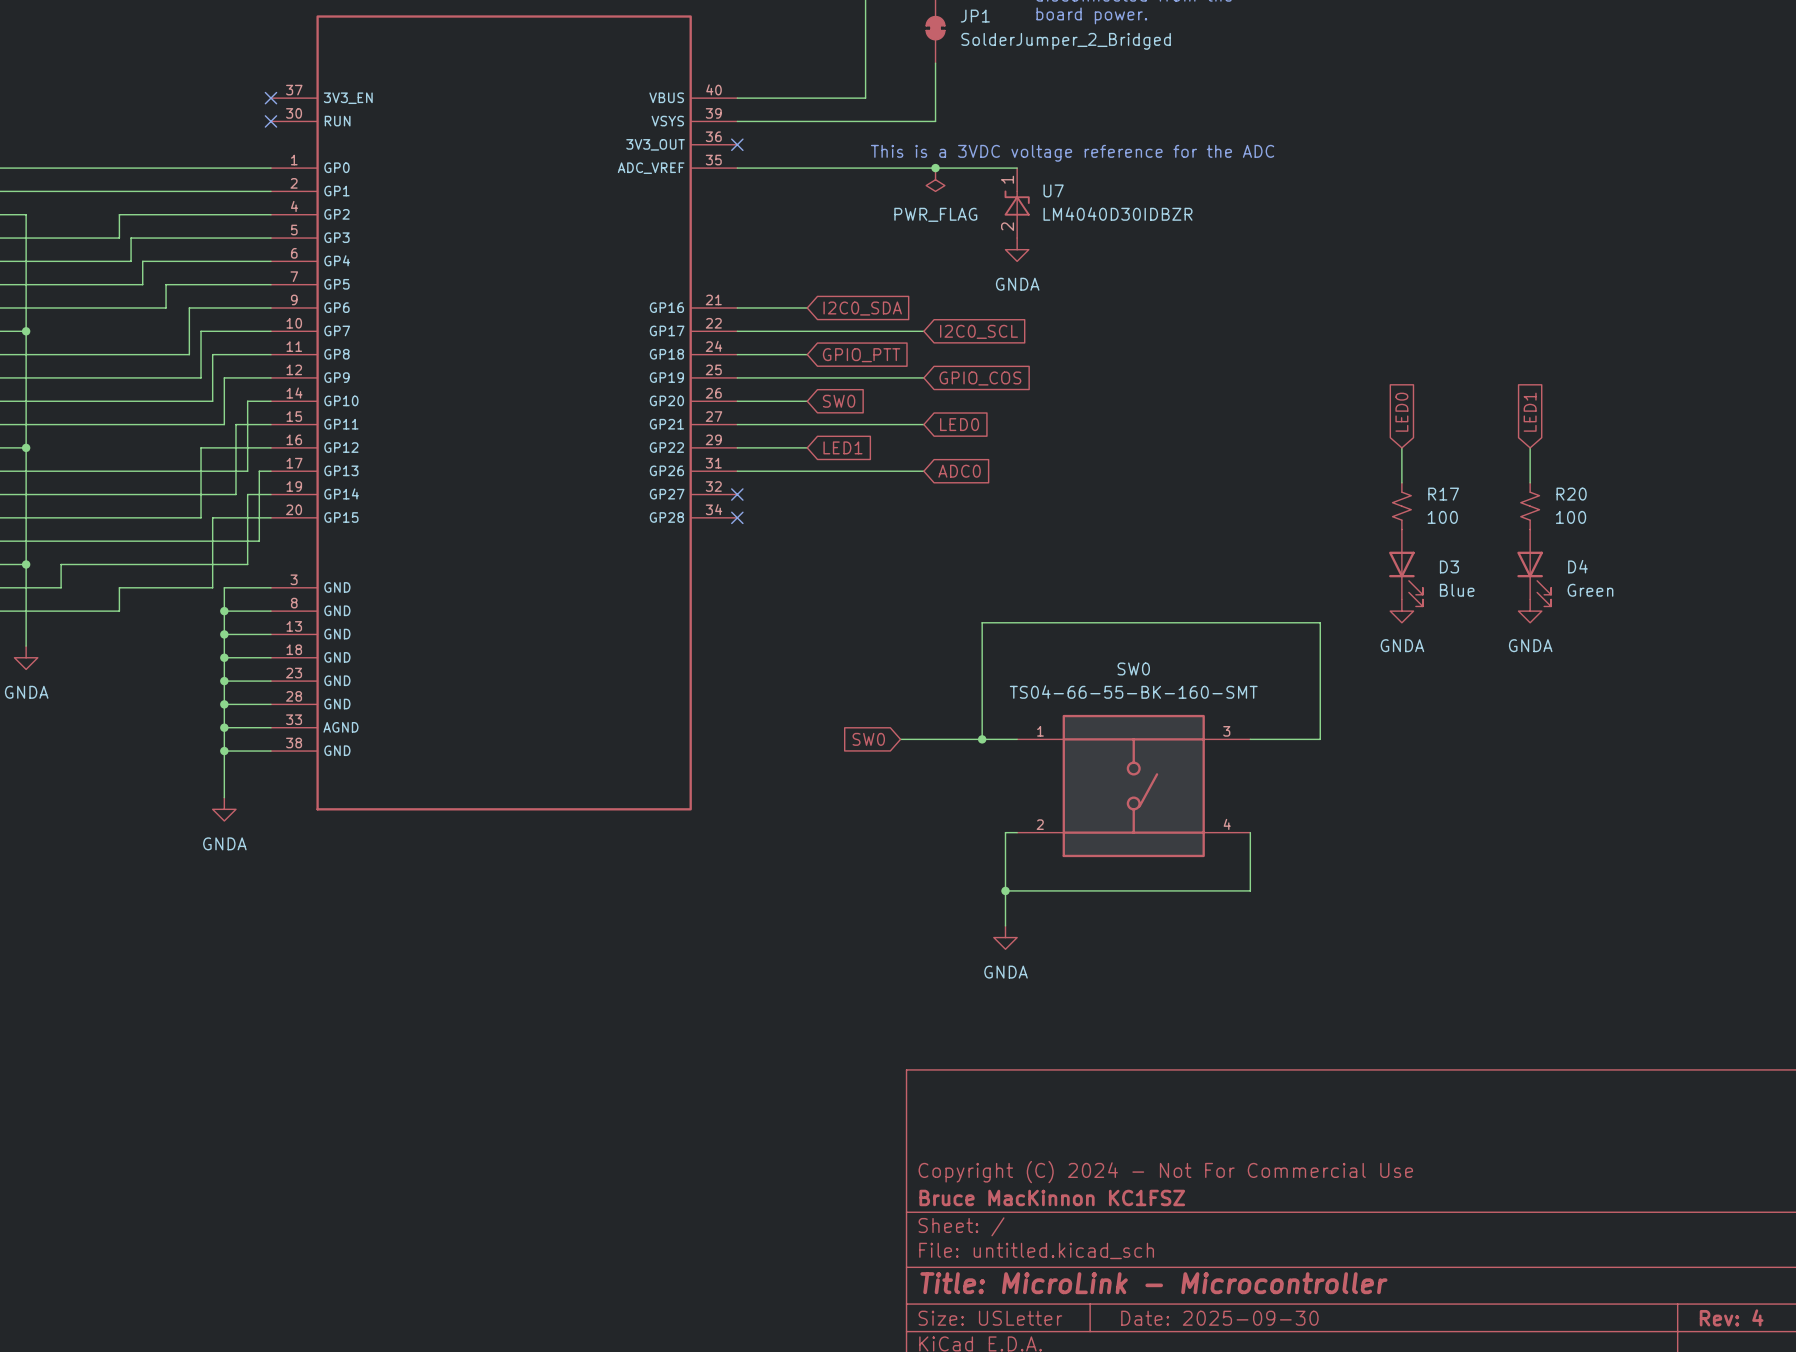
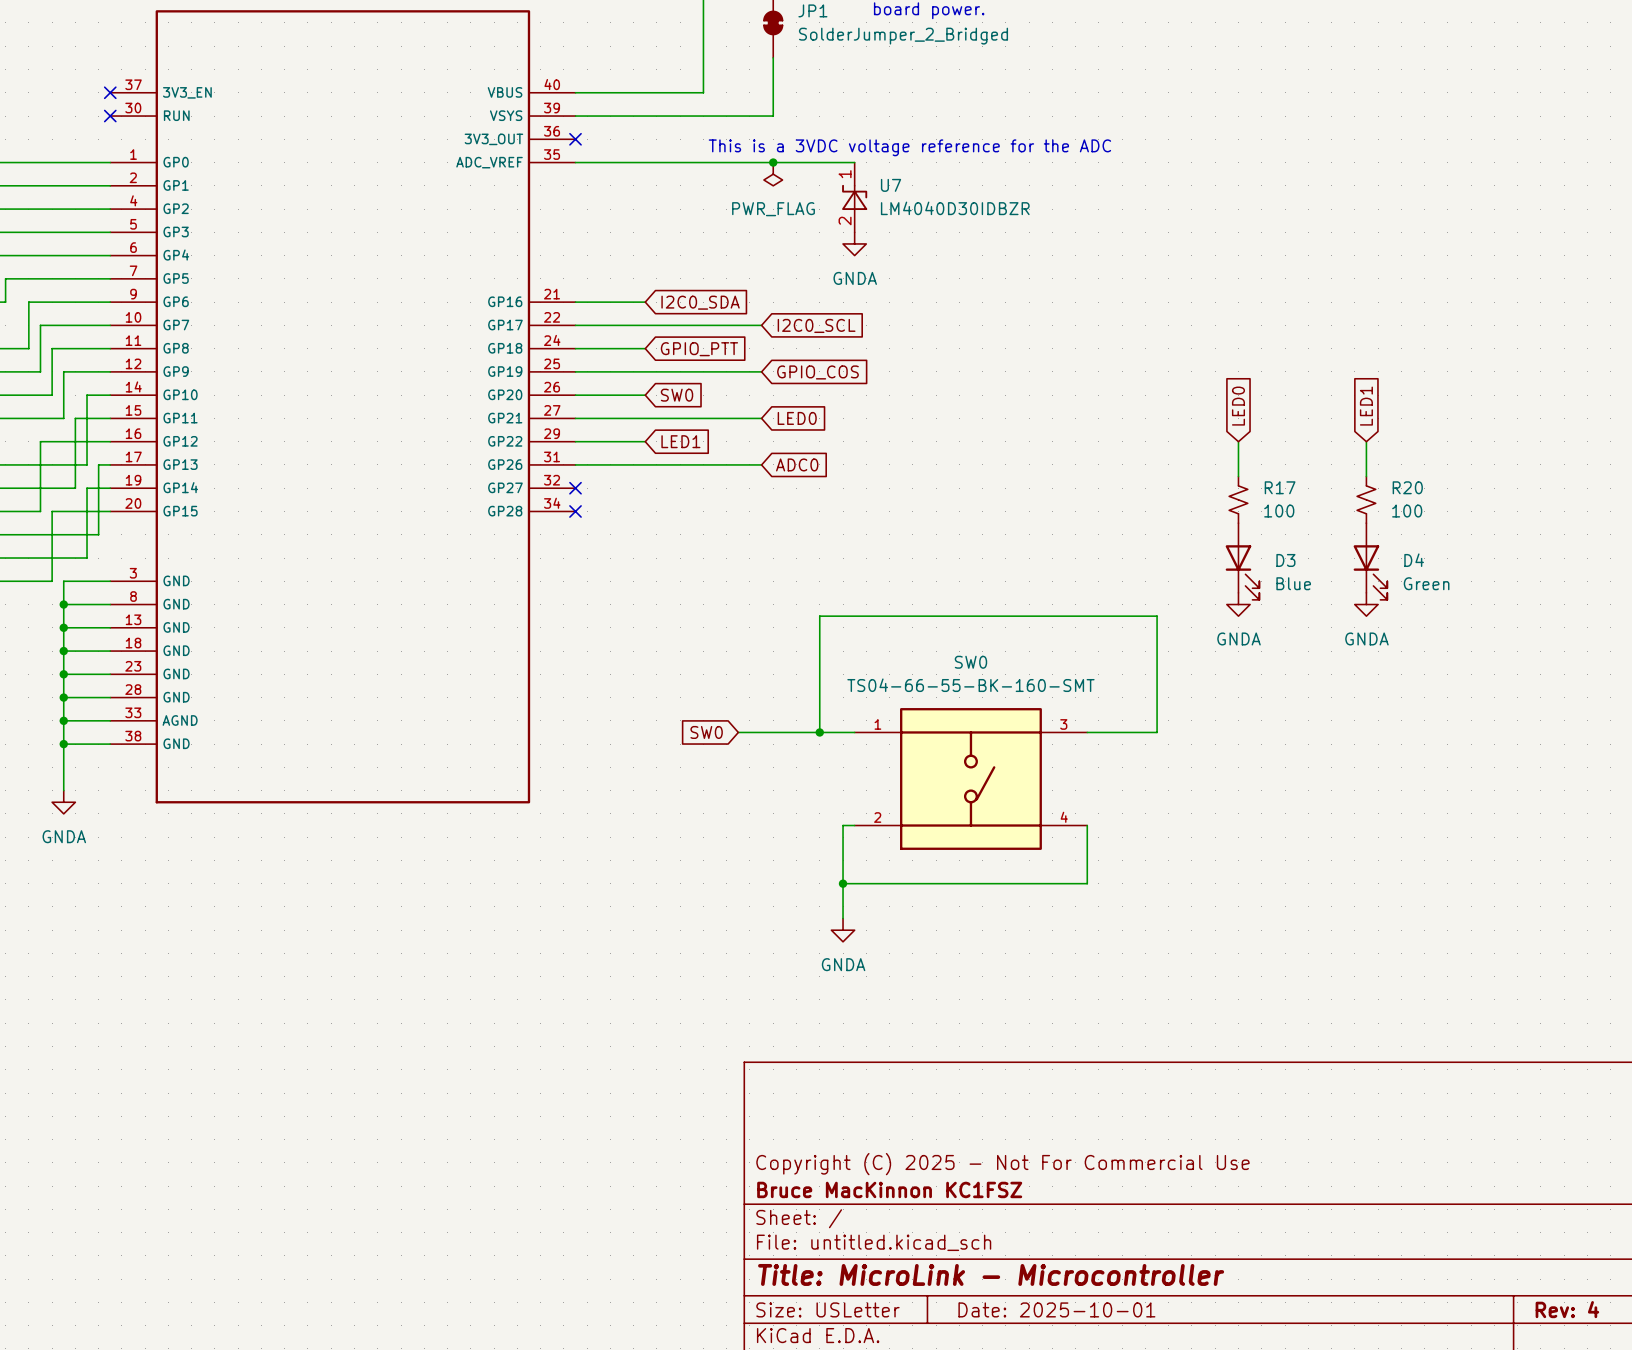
title block: Copyright (C) 2024 - Not For Commercial Use (1165, 1172) -> Copyright (C) 2025 - Not For Commercial Use (1002, 1164)
title block: Date: 2025-09-30 (1219, 1318) -> Date: 2025-10-01 (1056, 1309)

